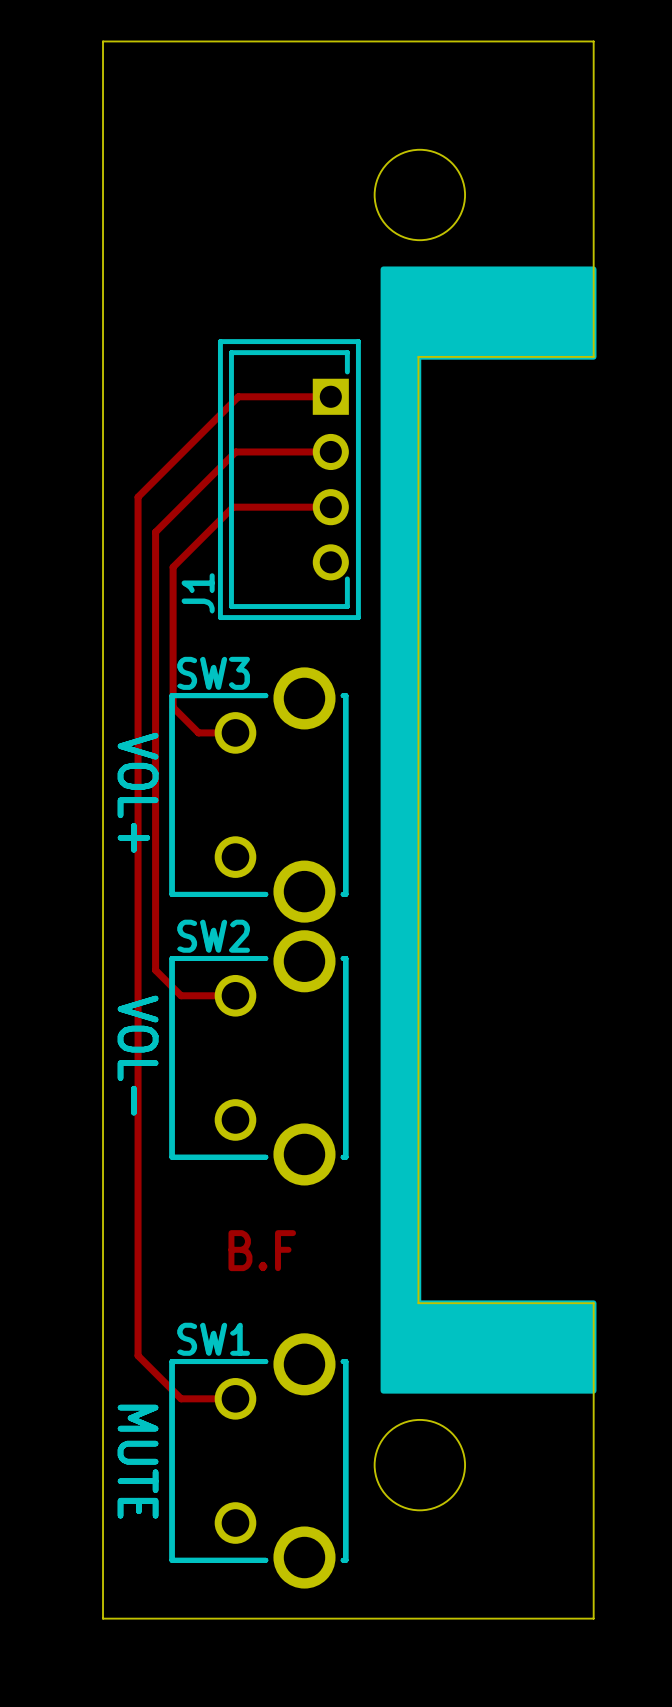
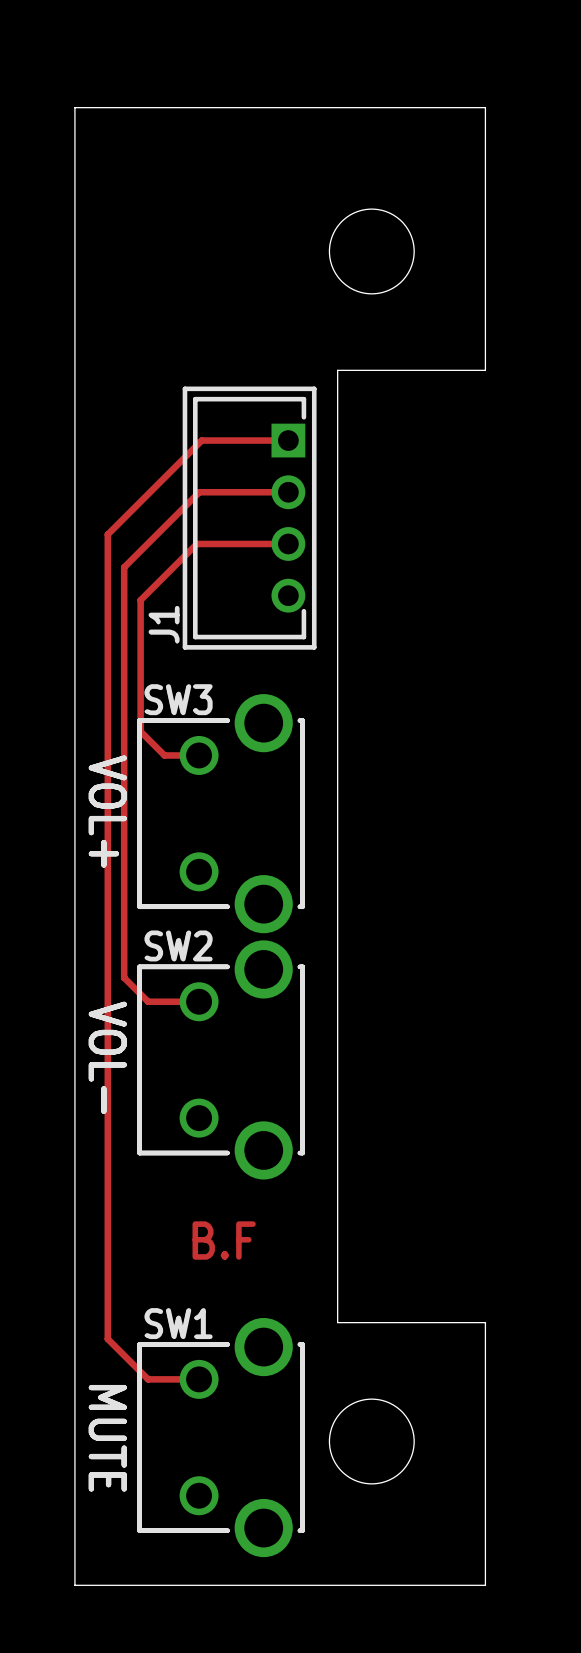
board edge: (541, 41) (593, 41) (593, 356) (418, 356) (418, 1303) (593, 1303) (593, 1618) (541, 1618) -> (485, 107) (485, 370) (337, 370) (337, 1322) (485, 1322) (485, 1585)
drawing: [380, 266, 597, 1394] -> none

